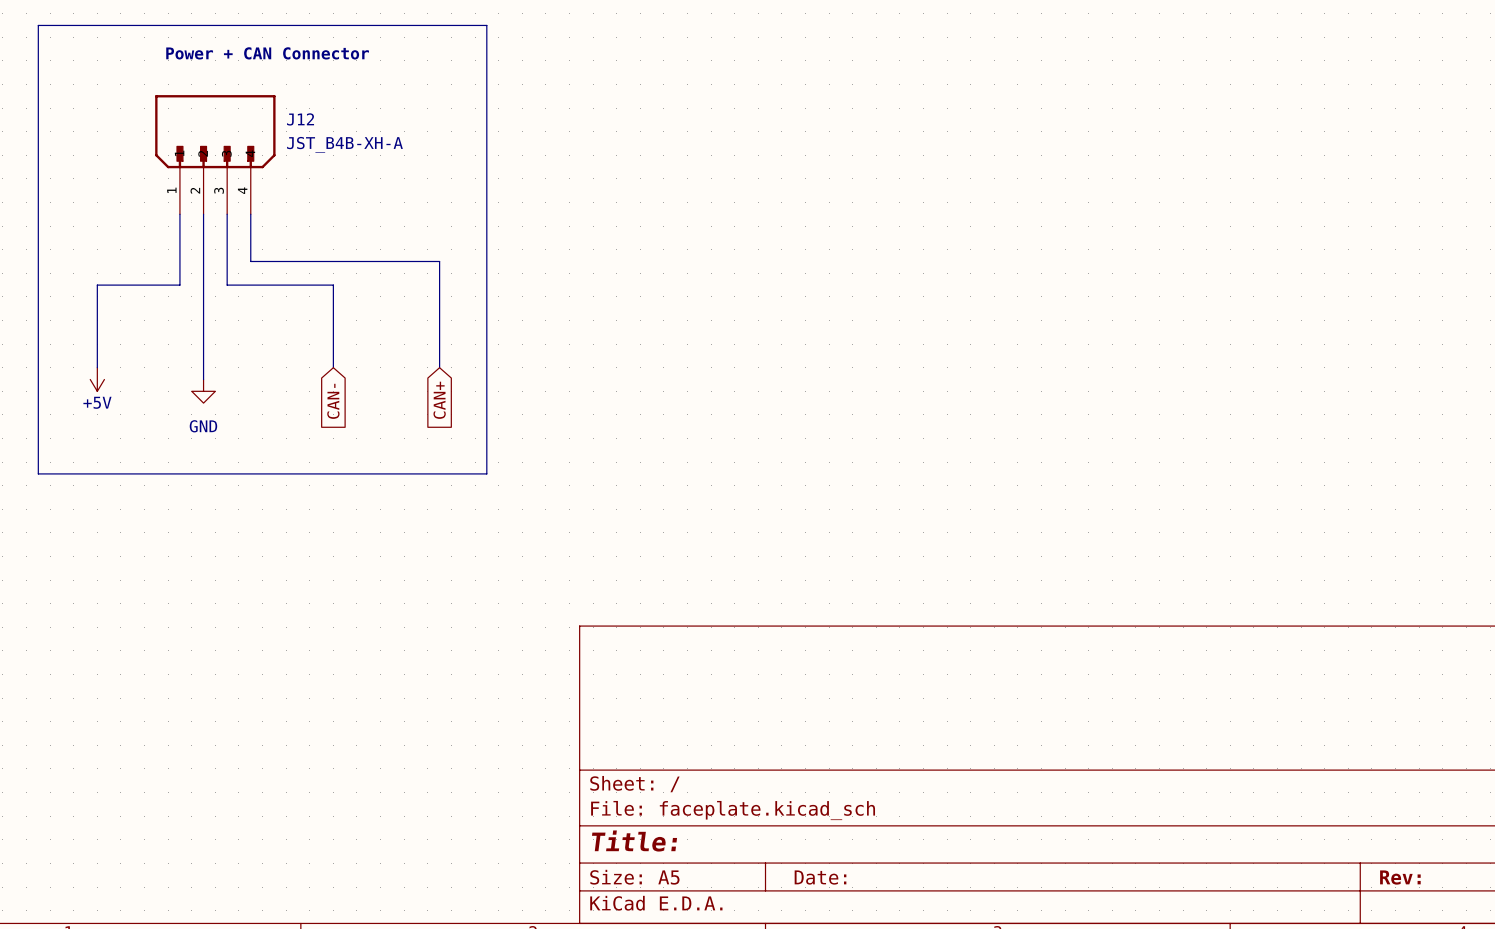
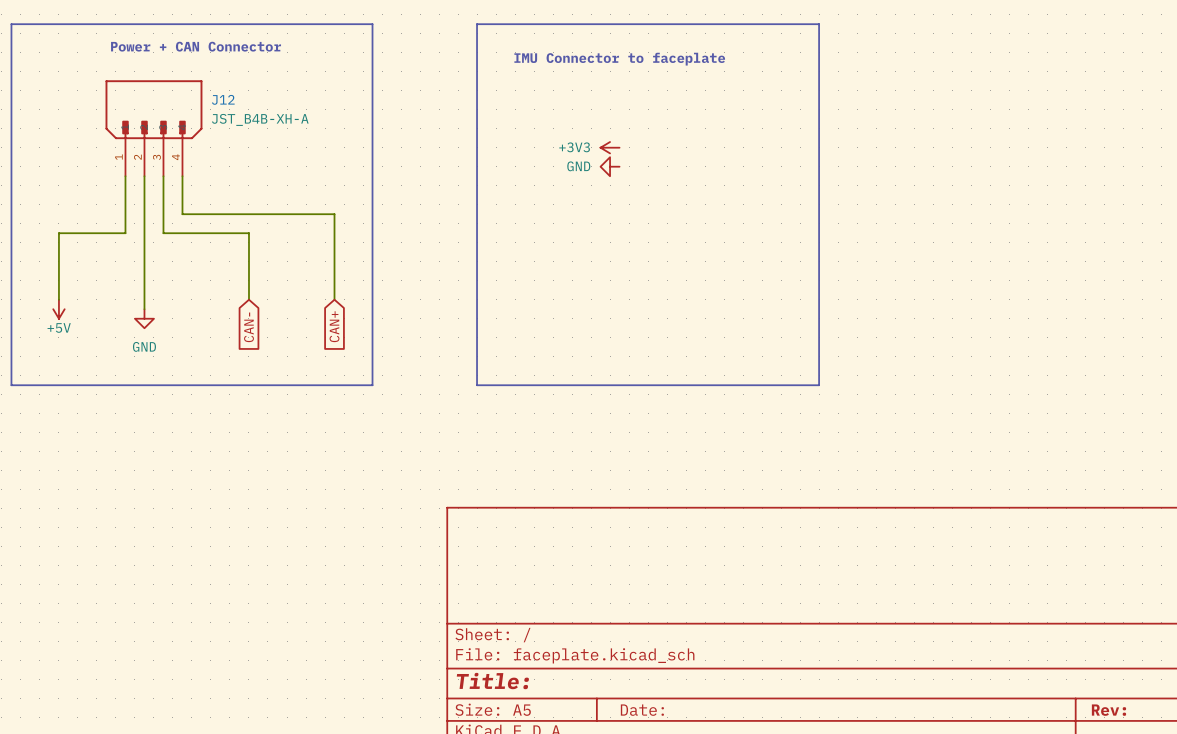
line: none -> (477, 24) (819, 24) (819, 385) (477, 385) (477, 24)
text: none -> IMU Connector to faceplate (619, 59)
power symbol: none -> +3V3 (610, 147)
power symbol: none -> GND (610, 166)

